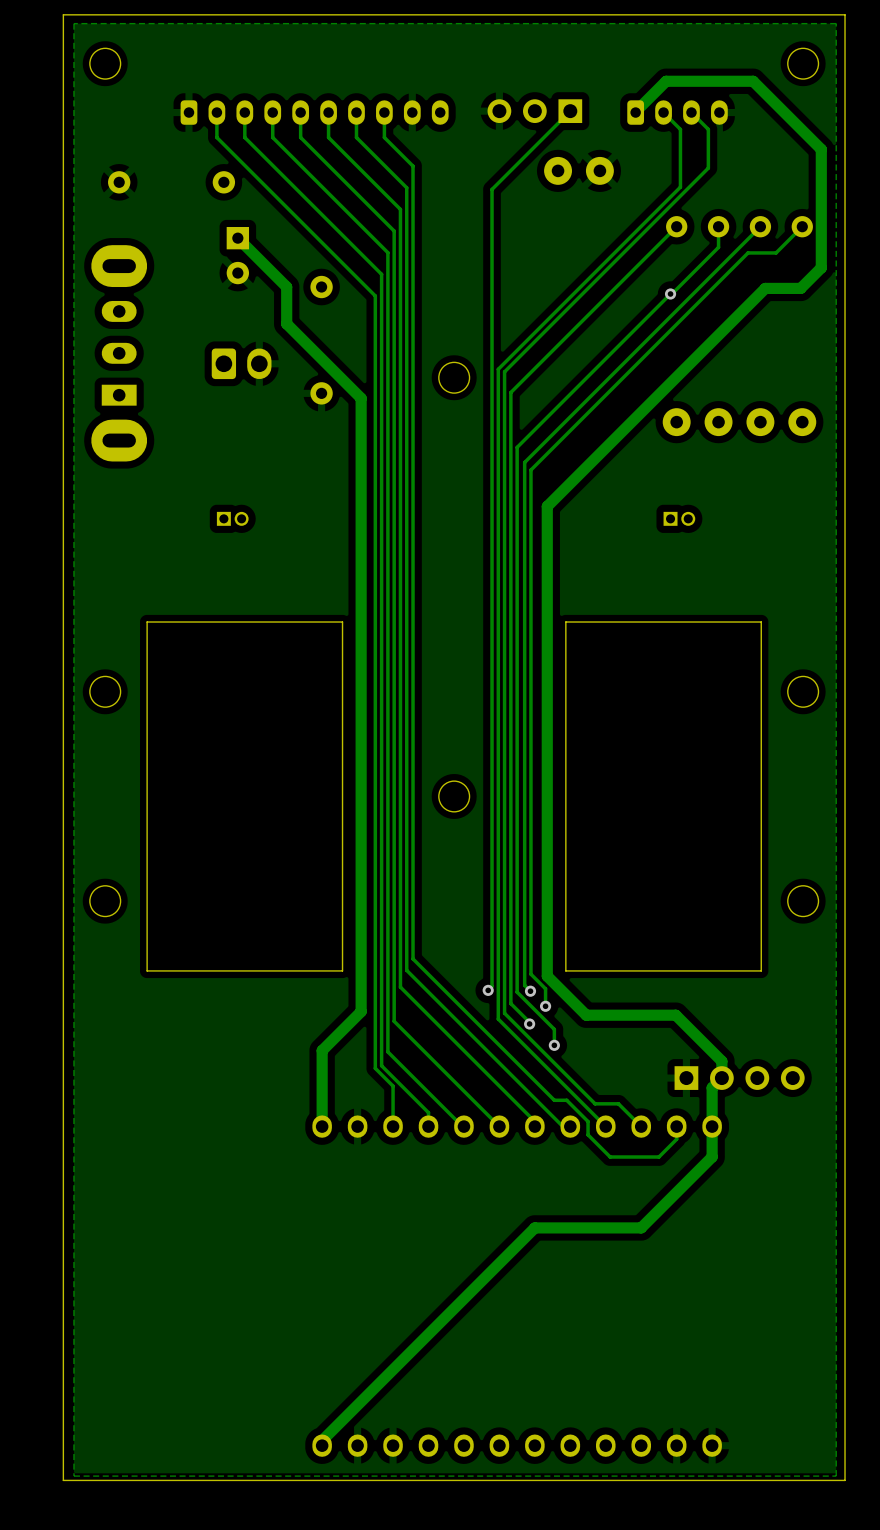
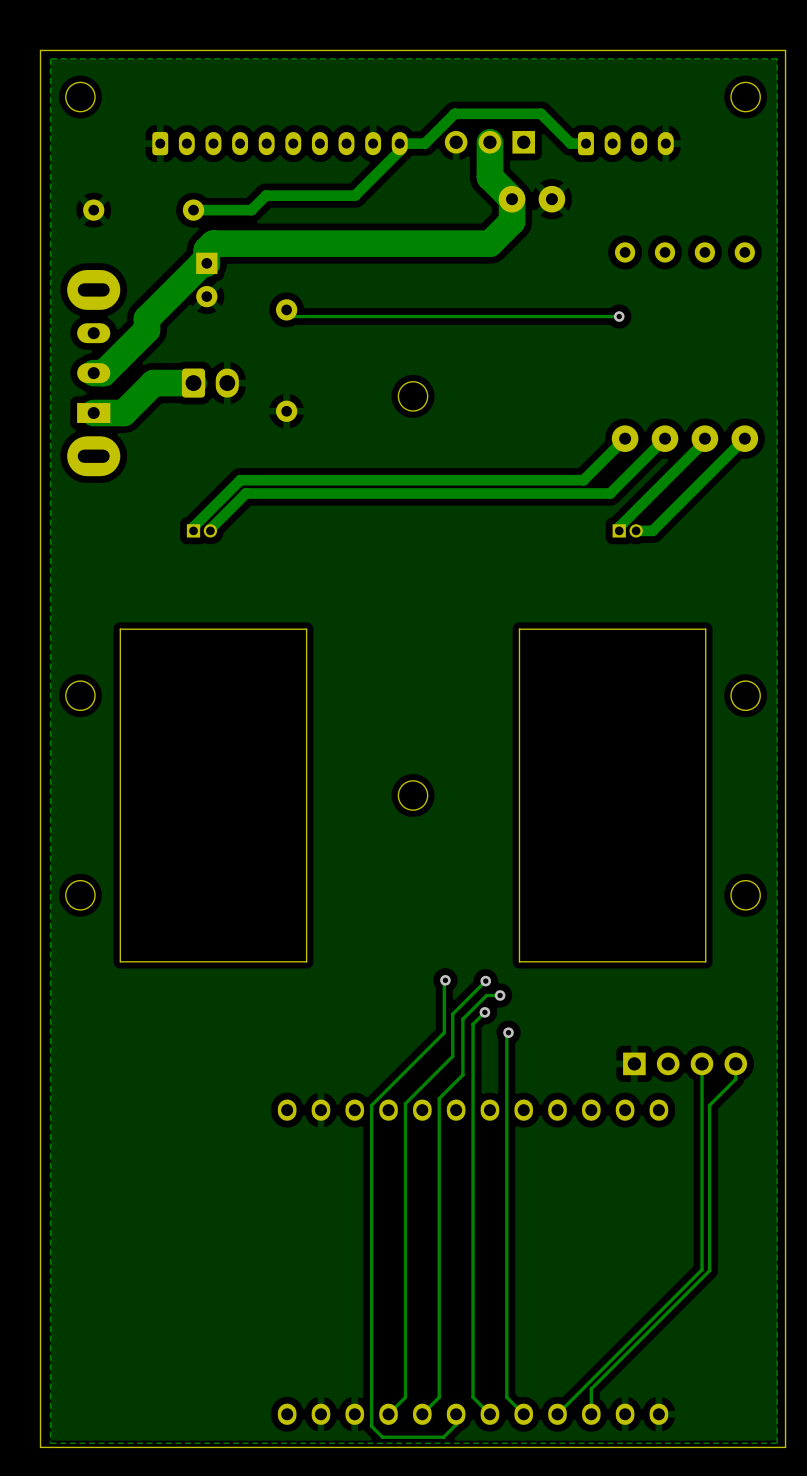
track: none -> (489, 142) (489, 177) (512, 199) (512, 221) (489, 243) (213, 243) (206, 250) (206, 263) (202, 263) (146, 318) (146, 329) (103, 373) (93, 373)
track: (570, 111) (492, 189) (492, 986) (488, 990) -> (456, 1414) (456, 1424) (443, 1437) (382, 1437) (371, 1426) (371, 1105) (444, 1032) (445, 980)
track: (216, 112) (216, 137) (375, 295) (375, 1068) (393, 1086) (393, 1126) -> none
track: (244, 112) (244, 137) (381, 274) (381, 1065) (428, 1112) (428, 1126) -> none
track: (272, 112) (272, 137) (387, 252) (387, 1051) (463, 1126) -> none
track: (300, 112) (300, 137) (394, 231) (394, 1021) (499, 1126) -> none
track: (328, 112) (328, 137) (400, 209) (400, 987) (534, 1121) (534, 1126) -> none
track: (356, 112) (356, 137) (406, 187) (406, 970) (562, 1126) (570, 1126) -> none
track: (384, 112) (384, 137) (413, 166) (413, 958) (554, 1100) (566, 1100) (588, 1121) (588, 1134) (610, 1157) (658, 1157) (676, 1139) (676, 1126) -> none
track: (635, 112) (666, 81) (753, 81) (821, 149) (821, 267) (800, 288) (765, 288) (547, 506) (547, 976) (586, 1015) (675, 1015) (721, 1061) (721, 1078) (712, 1087) (712, 1157) (641, 1227) (534, 1227) (322, 1440) (322, 1445) -> (585, 143) (570, 143) (541, 113) (454, 113) (424, 143) (399, 143) (399, 150) (354, 195) (265, 195) (251, 210) (193, 210)
track: (663, 112) (680, 129) (680, 187) (498, 369) (498, 1019) (605, 1126) -> none
track: (691, 112) (708, 129) (708, 168) (504, 371) (504, 1013) (595, 1103) (618, 1103) (641, 1126) -> none
track: (676, 226) (510, 392) (510, 1003) (529, 1024) -> (489, 1414) (473, 1397) (473, 1024) (484, 1012)
track: (718, 226) (718, 247) (517, 447) (517, 992) (554, 1029) (554, 1045) -> (523, 1414) (506, 1397) (506, 1034) (508, 1032)
track: (760, 226) (524, 462) (524, 985) (530, 991) -> (388, 1414) (405, 1397) (405, 1103) (452, 1056) (452, 1014) (485, 981)
track: (802, 226) (776, 252) (748, 252) (530, 470) (530, 974) (545, 988) (545, 1006) -> (422, 1414) (439, 1397) (439, 1098) (462, 1074) (462, 1019) (486, 995) (500, 995)
track: (237, 238) (286, 287) (286, 323) (361, 398) (361, 1011) (322, 1050) (322, 1126) -> none
track: none -> (286, 309) (293, 316) (619, 316)
track: none -> (193, 383) (153, 383) (123, 413) (93, 413)
track: none -> (625, 438) (583, 480) (240, 480) (193, 527) (193, 530)
track: none -> (665, 438) (610, 493) (245, 493) (210, 530)
track: none -> (704, 438) (704, 441) (619, 527) (619, 530)
track: none -> (744, 438) (652, 530) (636, 530)
track: none -> (701, 1063) (701, 1269) (557, 1414)
track: none -> (735, 1063) (735, 1079) (709, 1105) (709, 1270) (591, 1388) (591, 1414)

